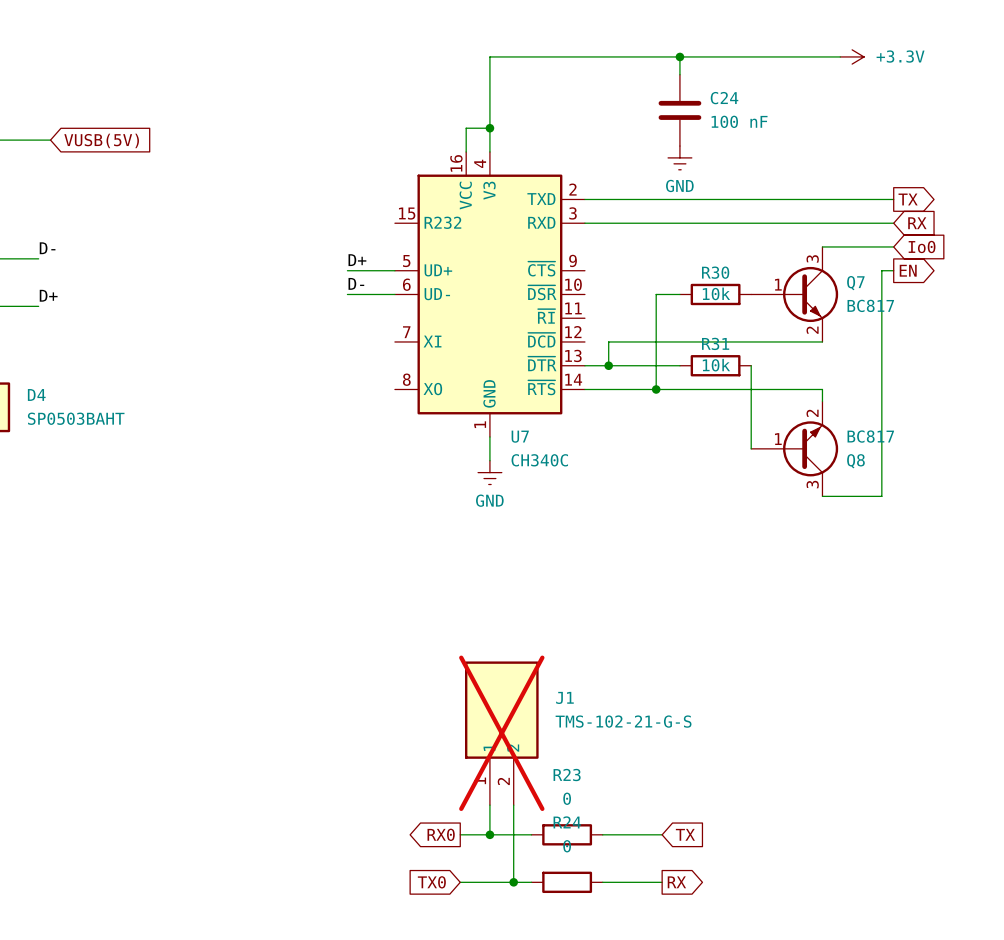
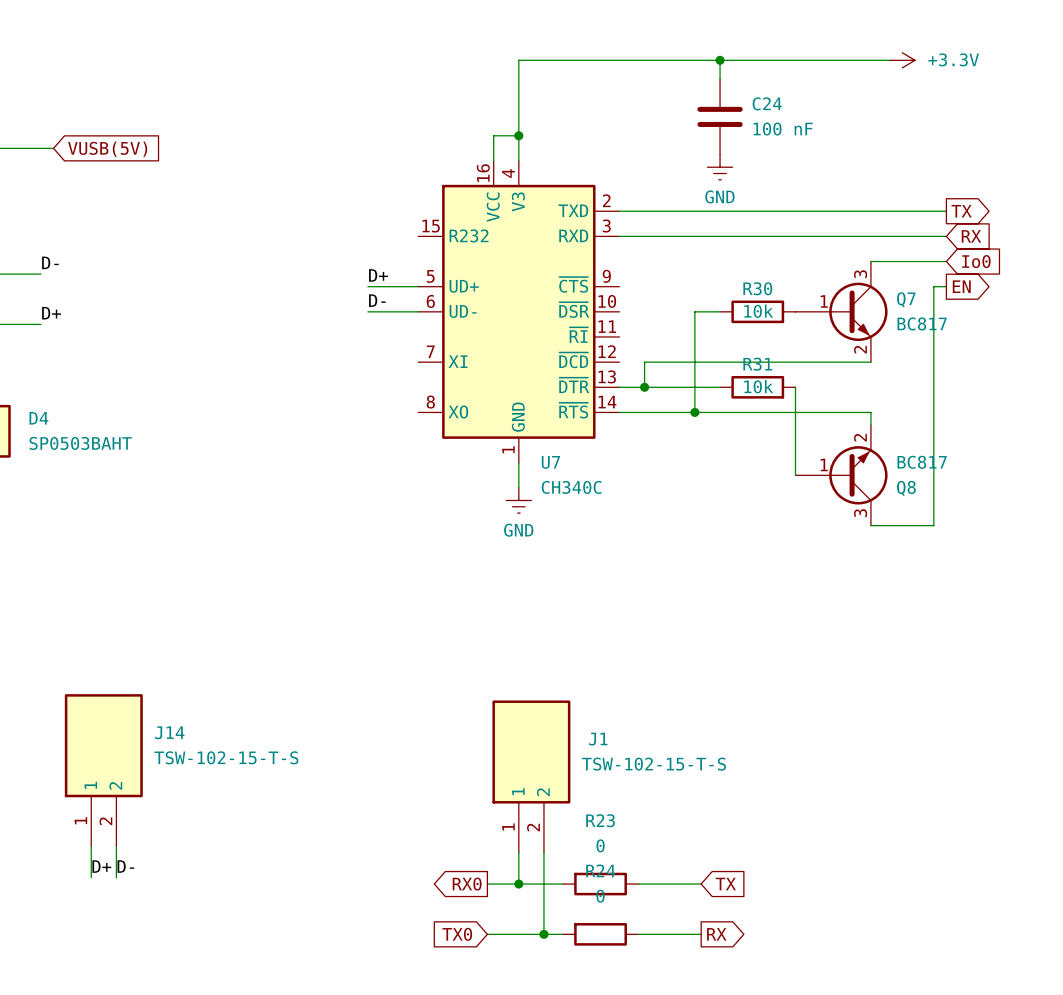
J1 value: TMS-102-21-G-S (623, 721) -> TSW-102-15-T-S (654, 764)
J14: none -> TSW-102-15-T-S (103, 770)
J1 do-not-place cross: (501, 733) -> none
wire: none -> (91, 846) (91, 877)
wire: none -> (116, 846) (116, 877)
label: none -> D+ (101, 866)
label: none -> D- (125, 866)

